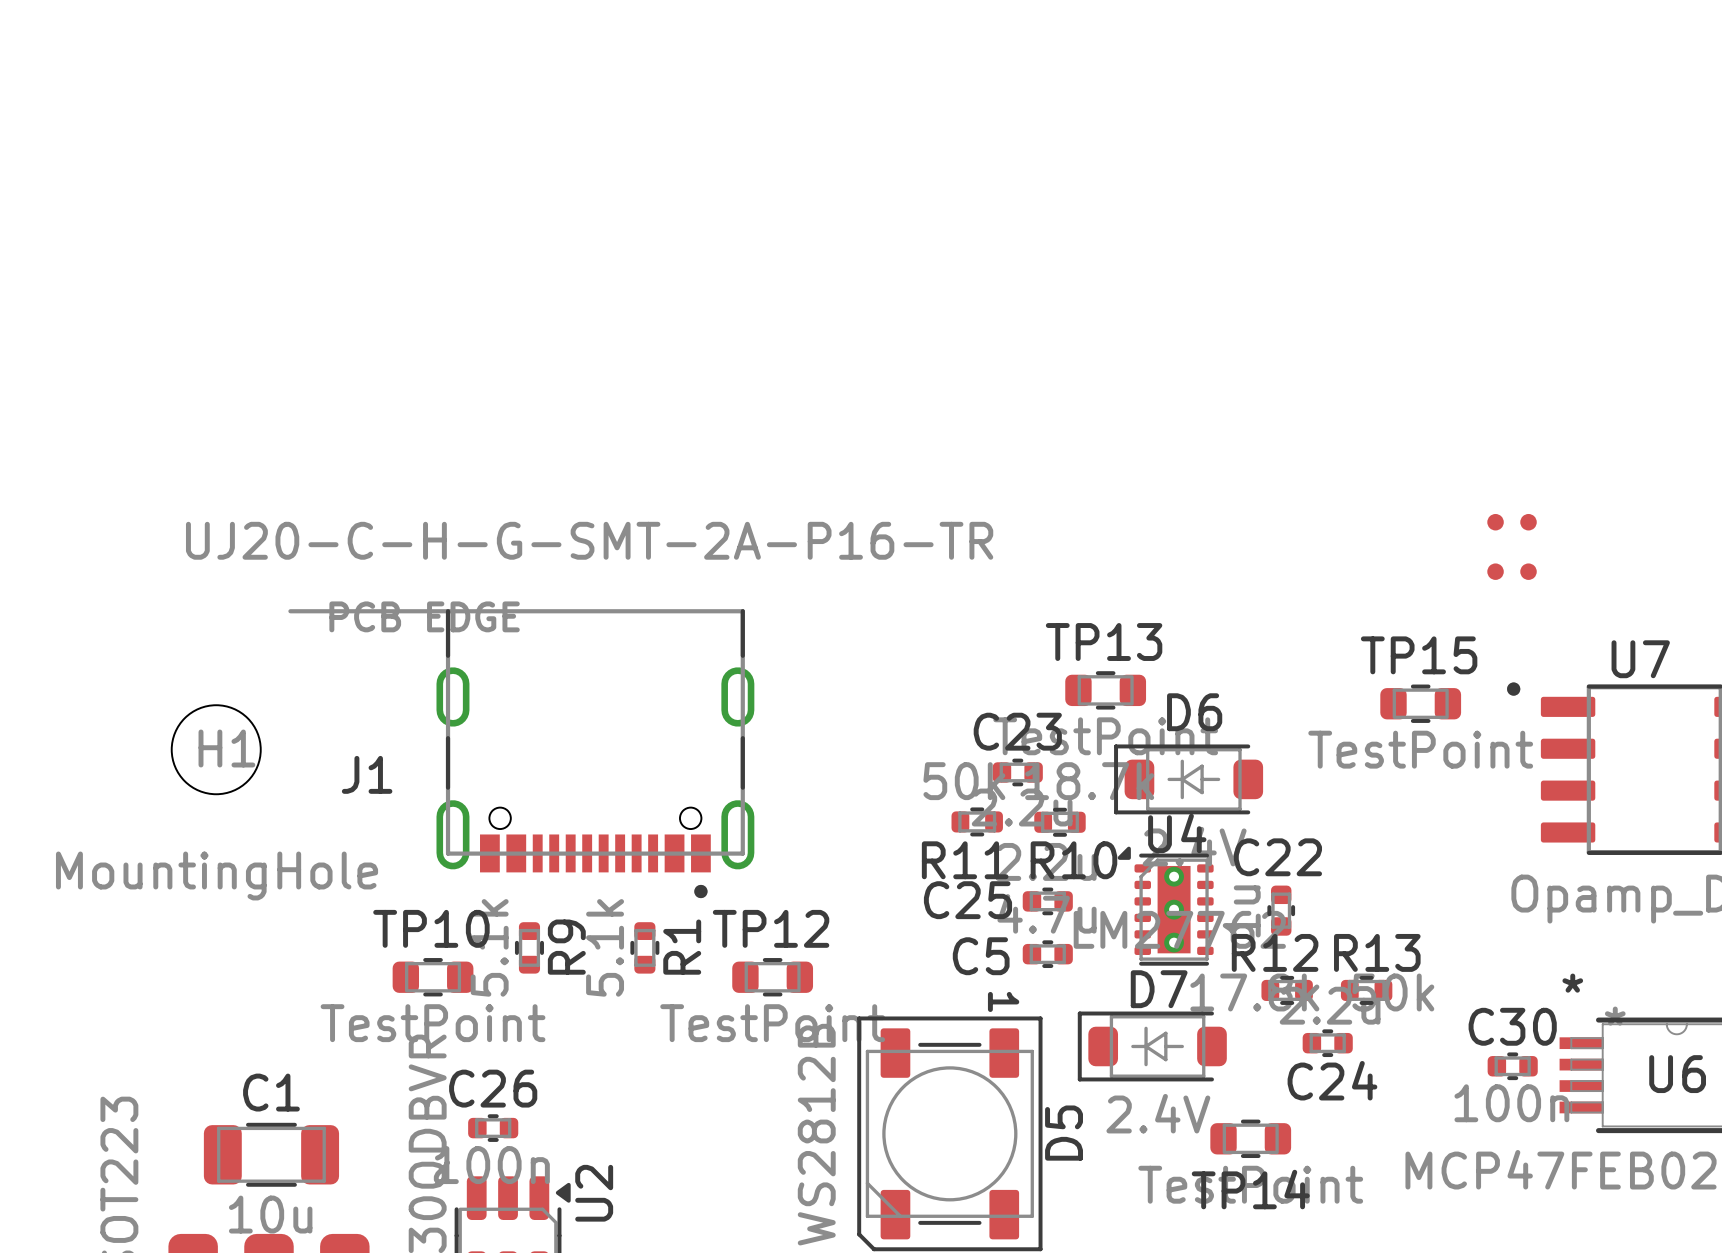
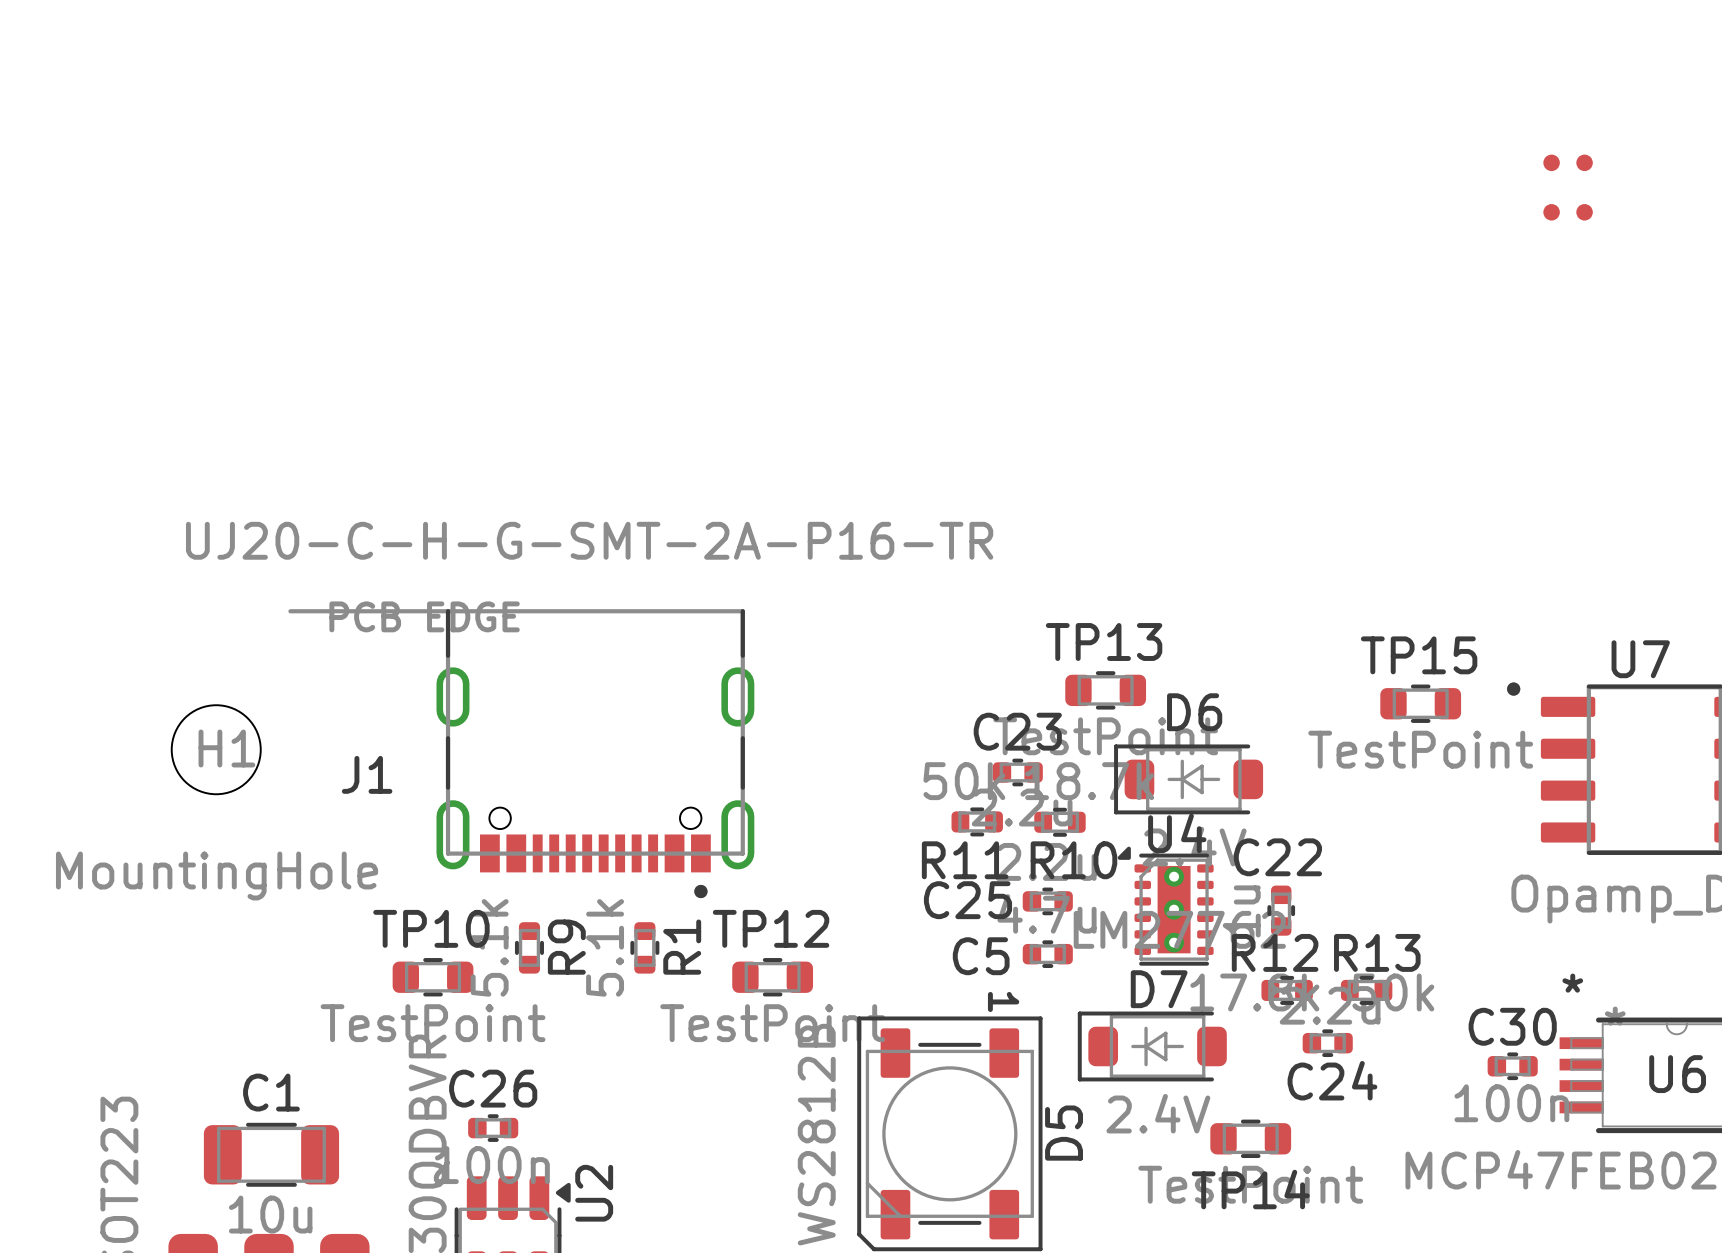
part: none -> (1568, 162)
part: none -> (1568, 212)
part: (1512, 522) -> none
part: (1512, 571) -> none

